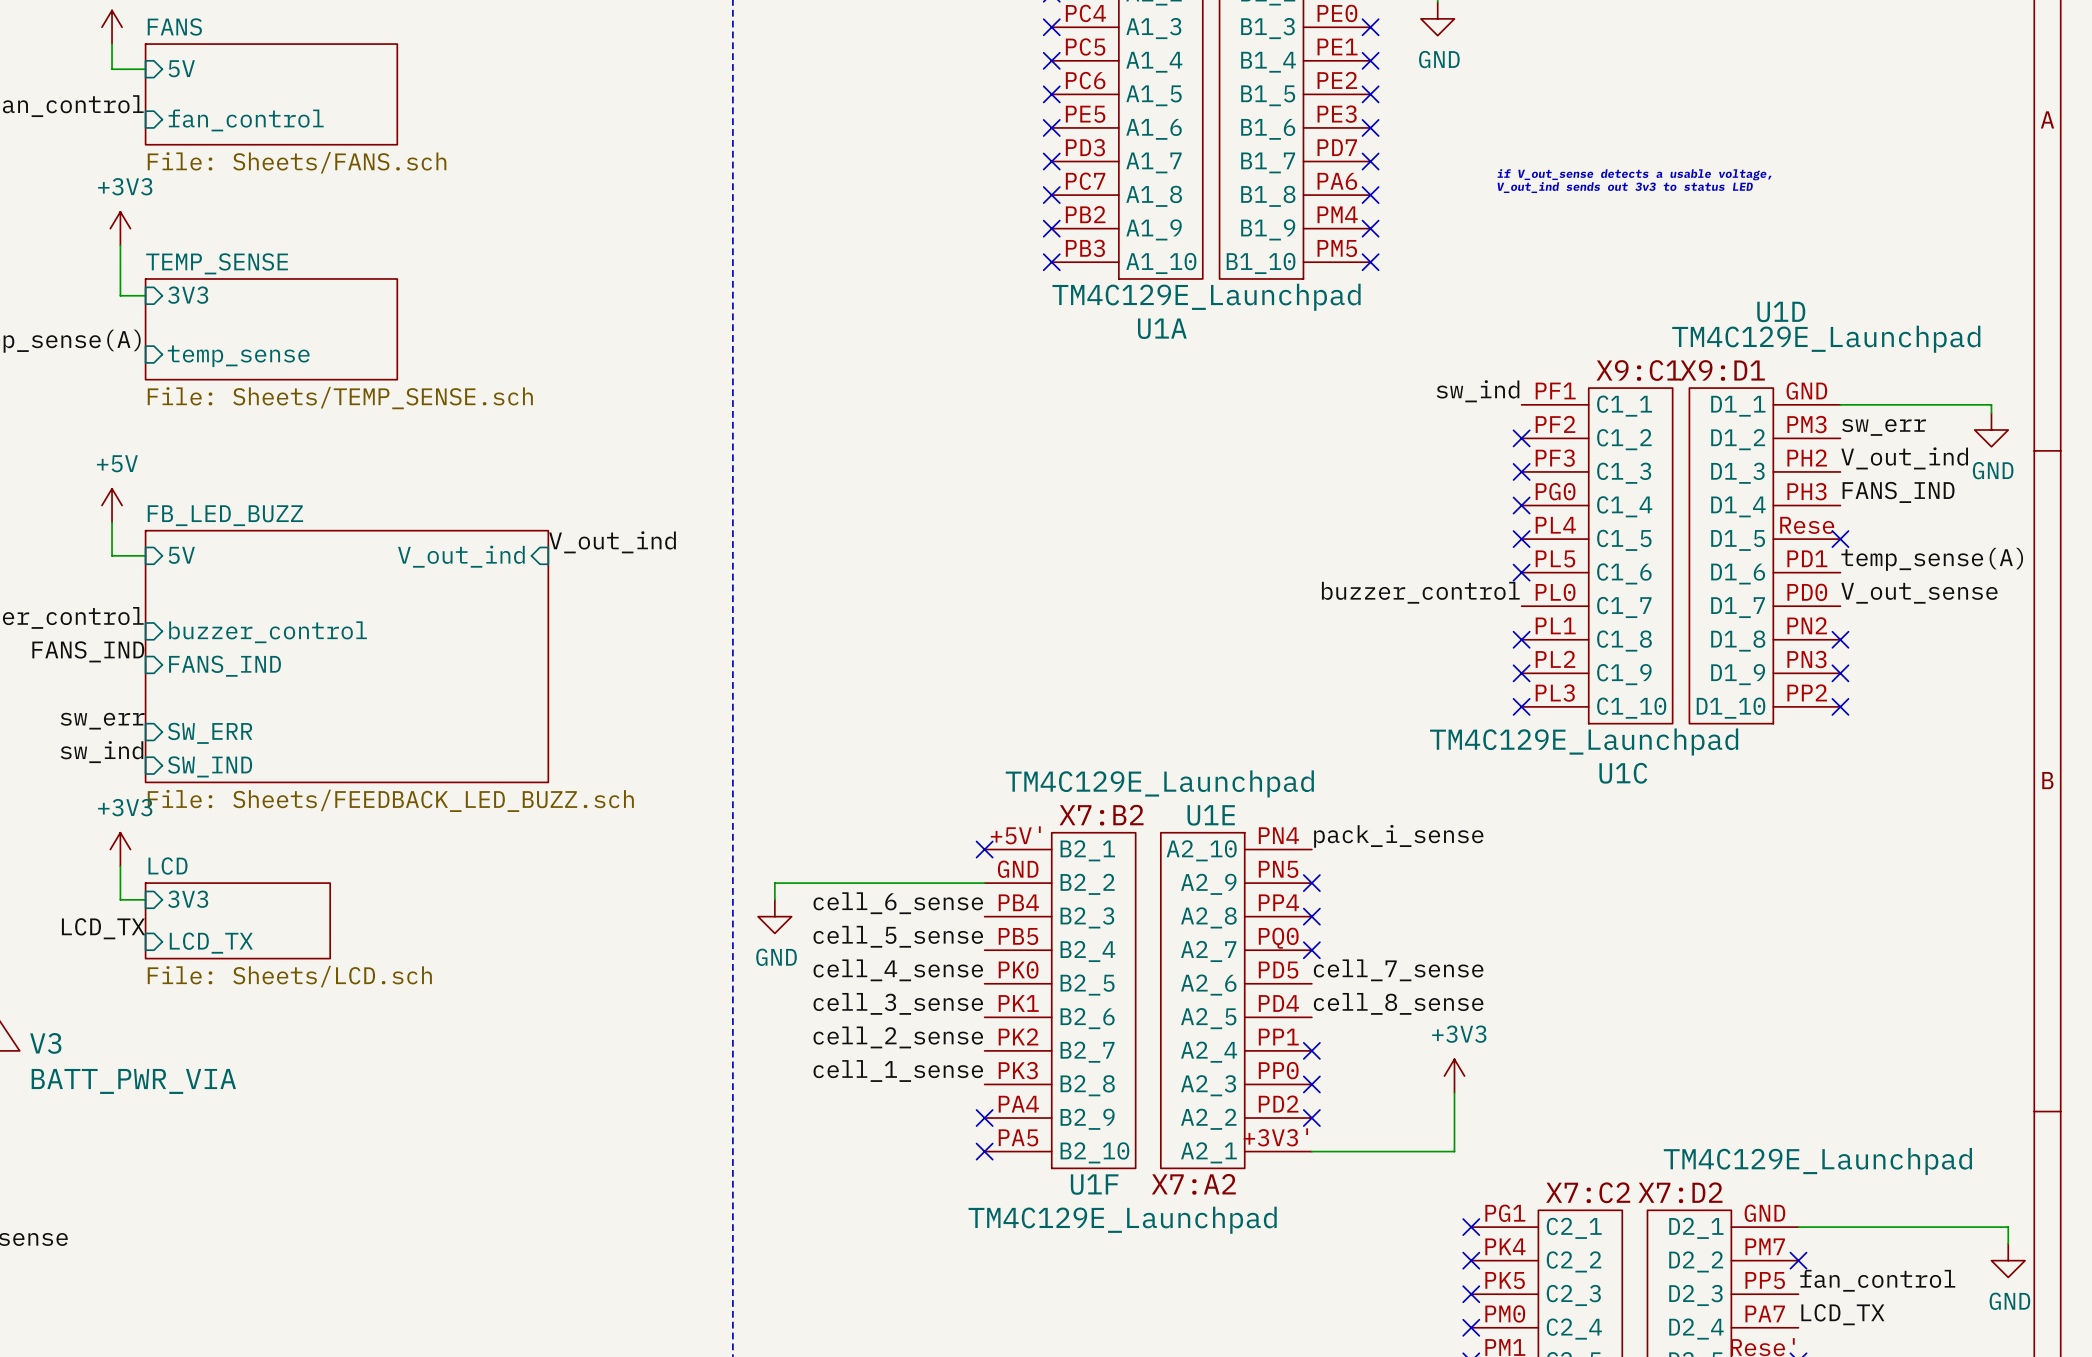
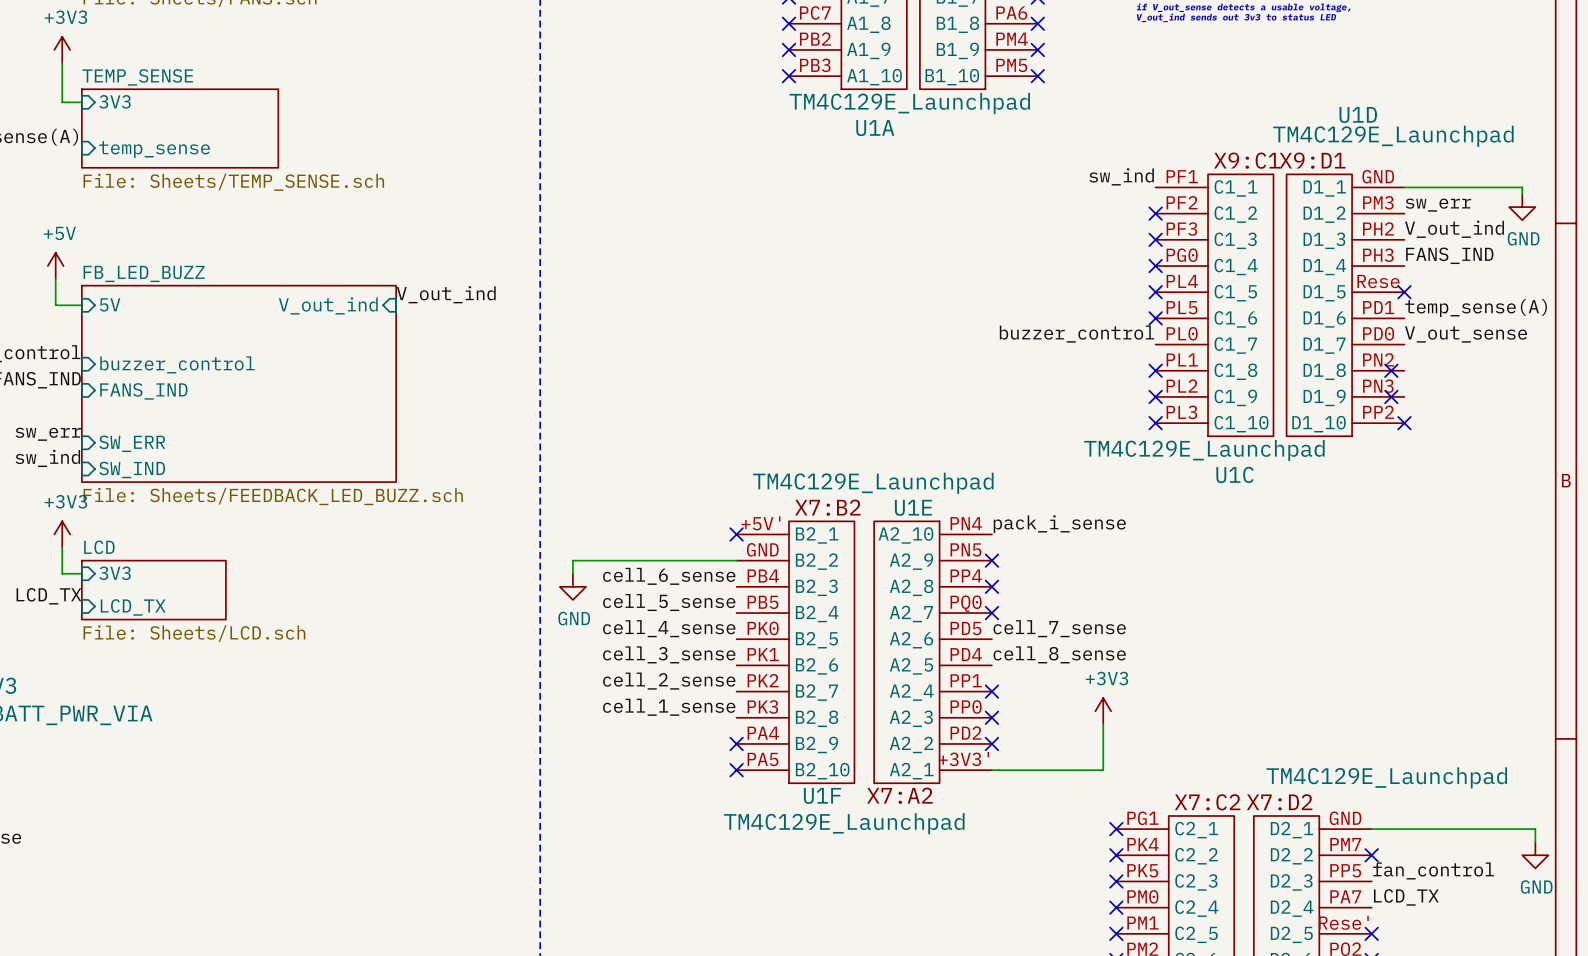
no-connect mark position: (1840, 639) -> (1391, 370)
no-connect mark position: (1840, 673) -> (1391, 396)

